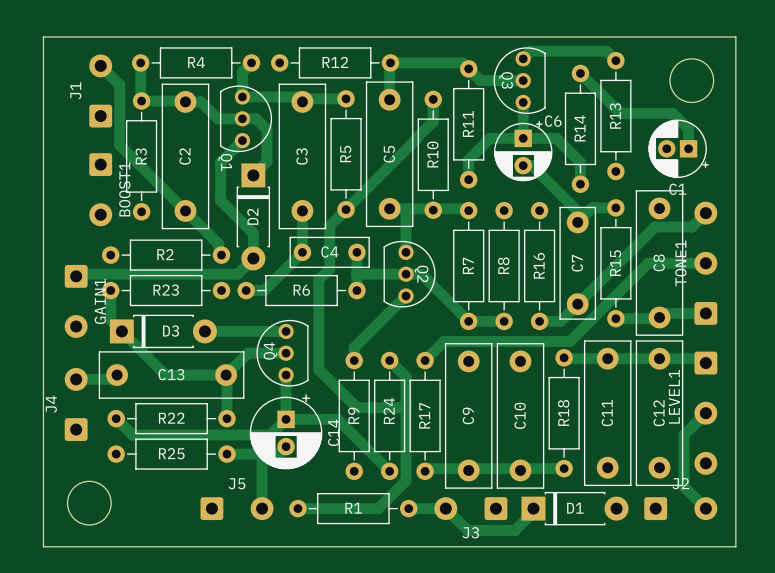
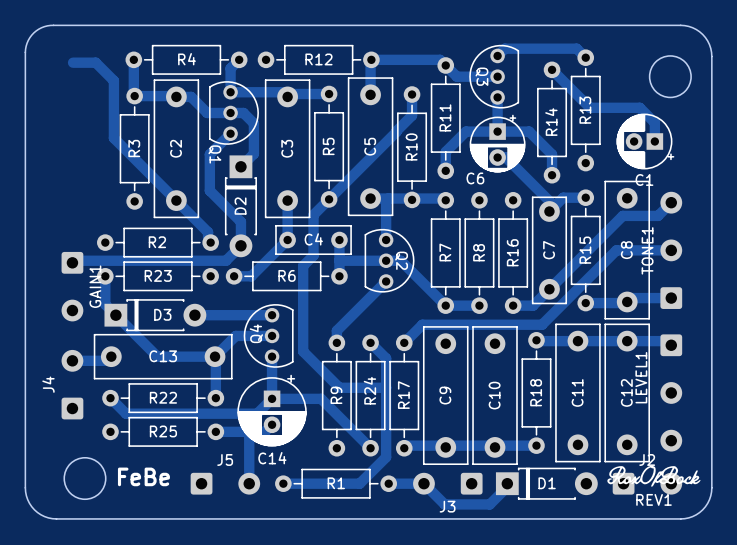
board edge: (43, 37) (735, 37) (735, 546) (43, 546) (43, 37) -> (53, 25) (41, 27) (33, 32) (27, 43) (25, 52) (25, 487) (27, 499) (37, 512) (48, 517) (56, 518) (680, 518) (696, 514) (705, 506) (709, 499) (711, 487) (711, 56) (709, 44) (699, 31) (688, 26) (680, 25) (53, 25)
track: none -> (73, 62) (95, 62)
round board edge position: (691, 80) -> (670, 76)
J1: (100, 91) -> none
C6 name position: C6 (553, 121) -> C6 (475, 178)
BOOST1: (100, 189) -> none
track: (705, 413) (684, 435) (684, 486) (705, 508) -> none
C14 name rotation: 0° (333, 432) -> 90° clockwise (272, 458)
C14 name position: C14 (333, 432) -> C14 (272, 458)
REV1: none -> (653, 476)
text: none -> FeBe (143, 476)

